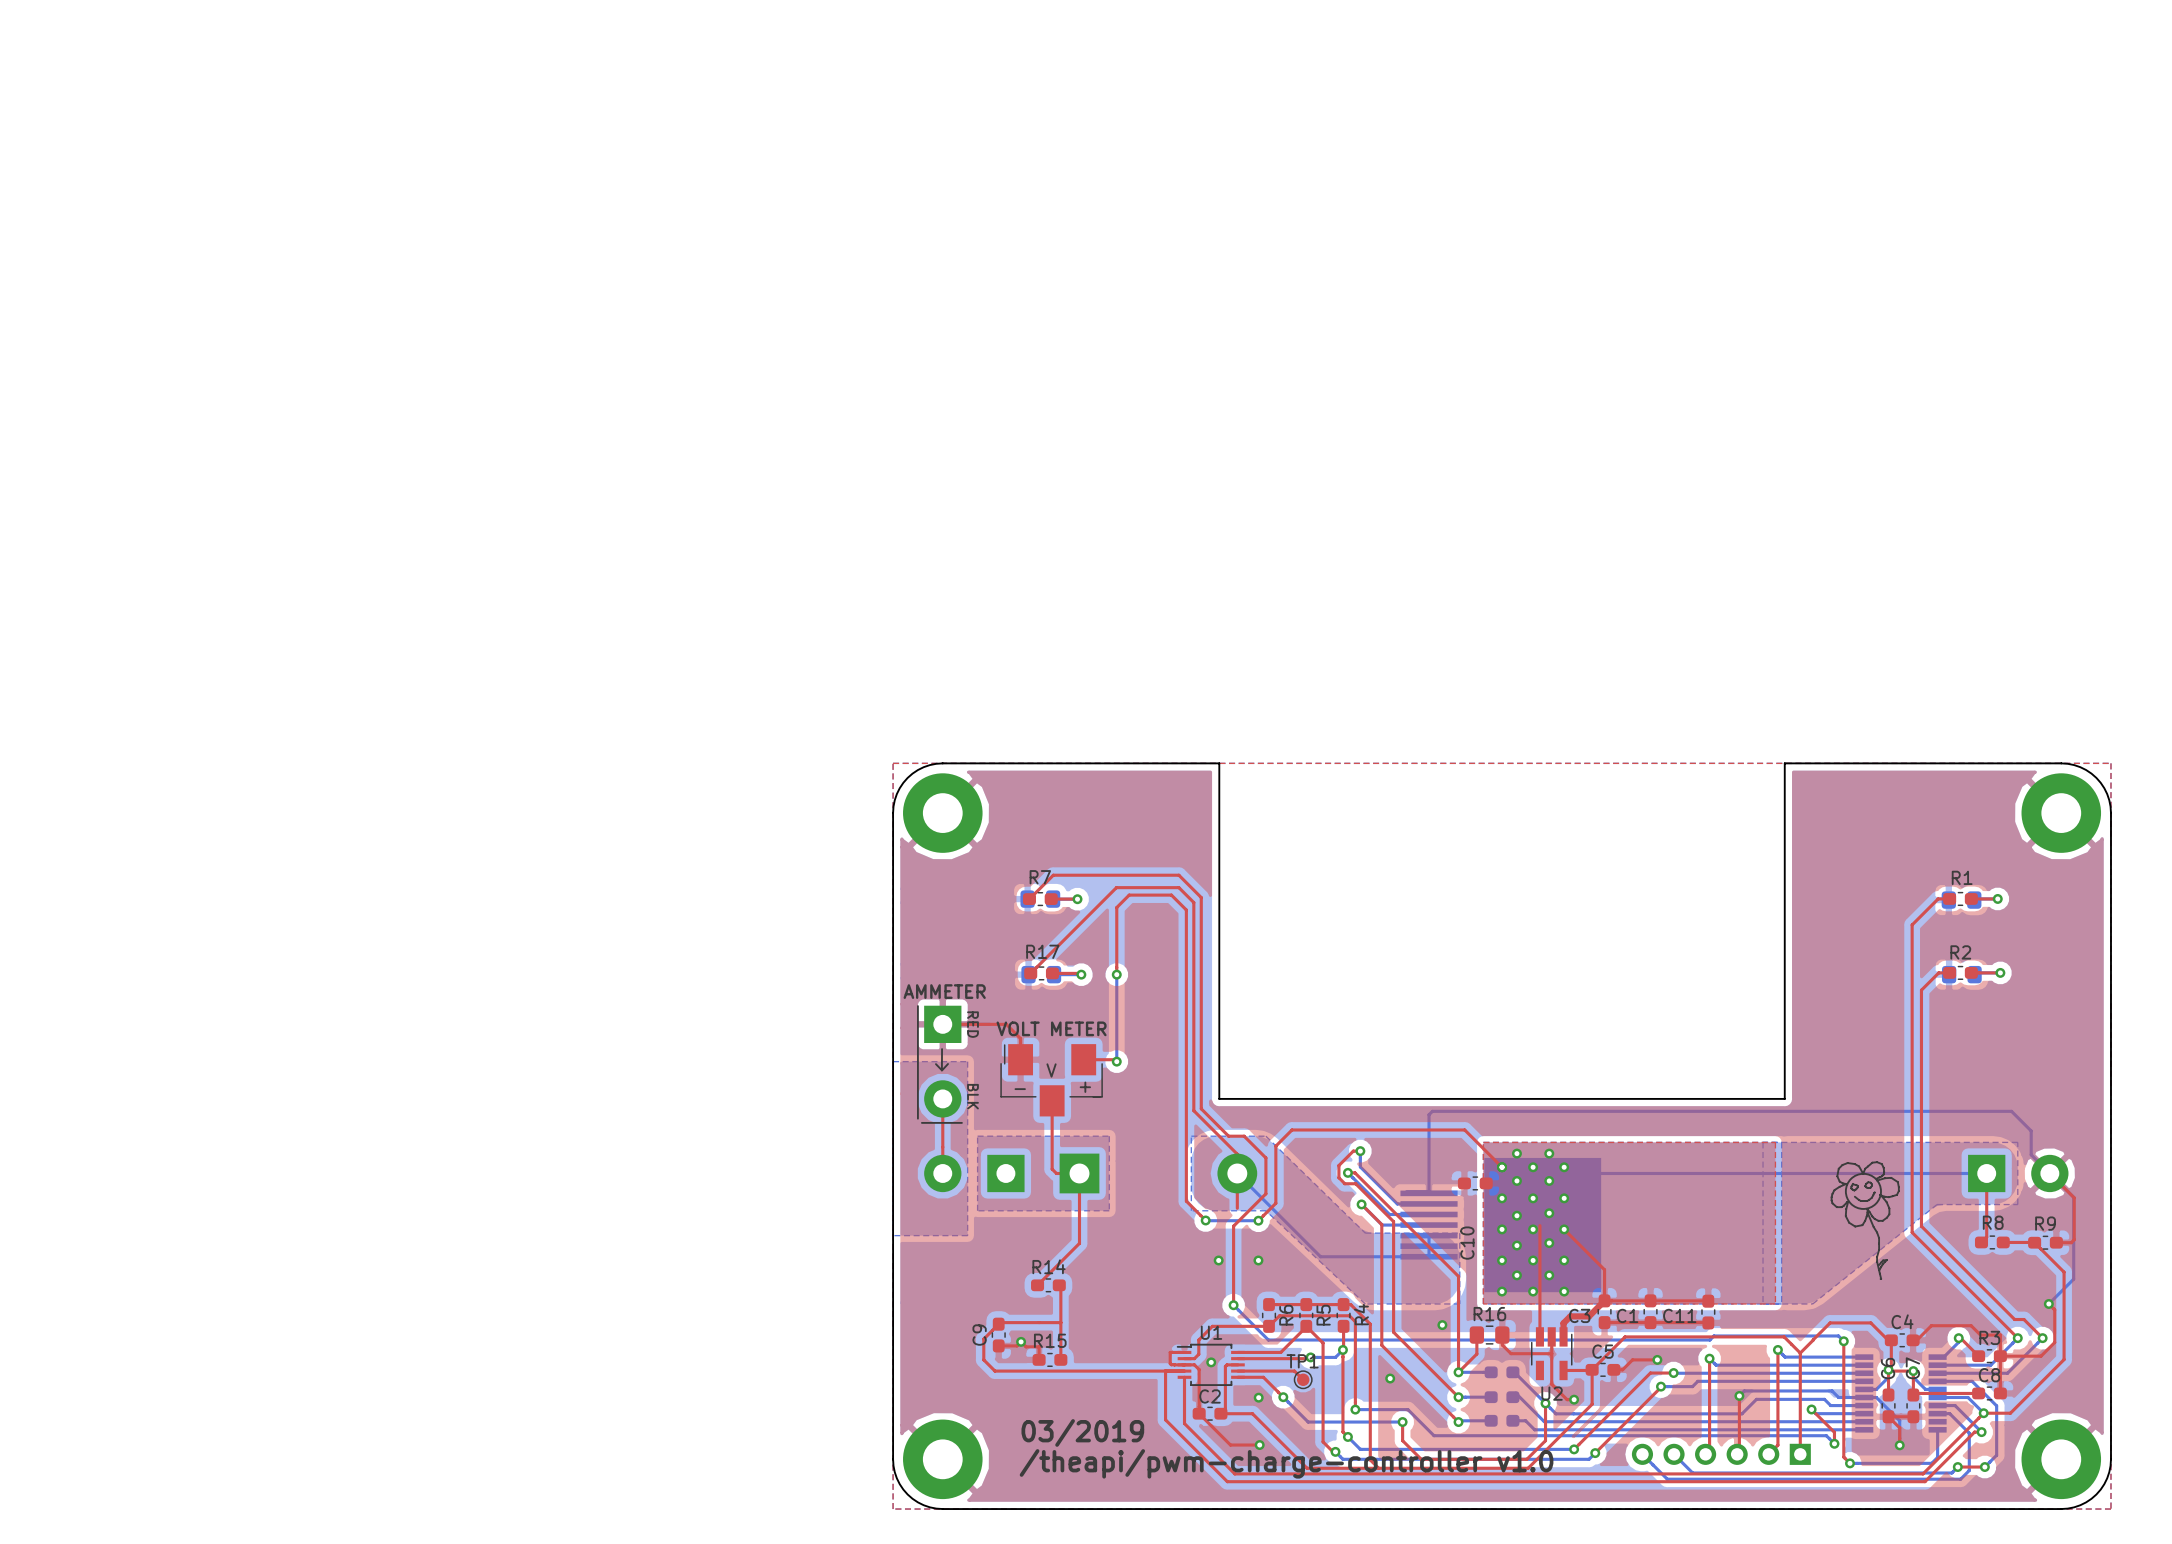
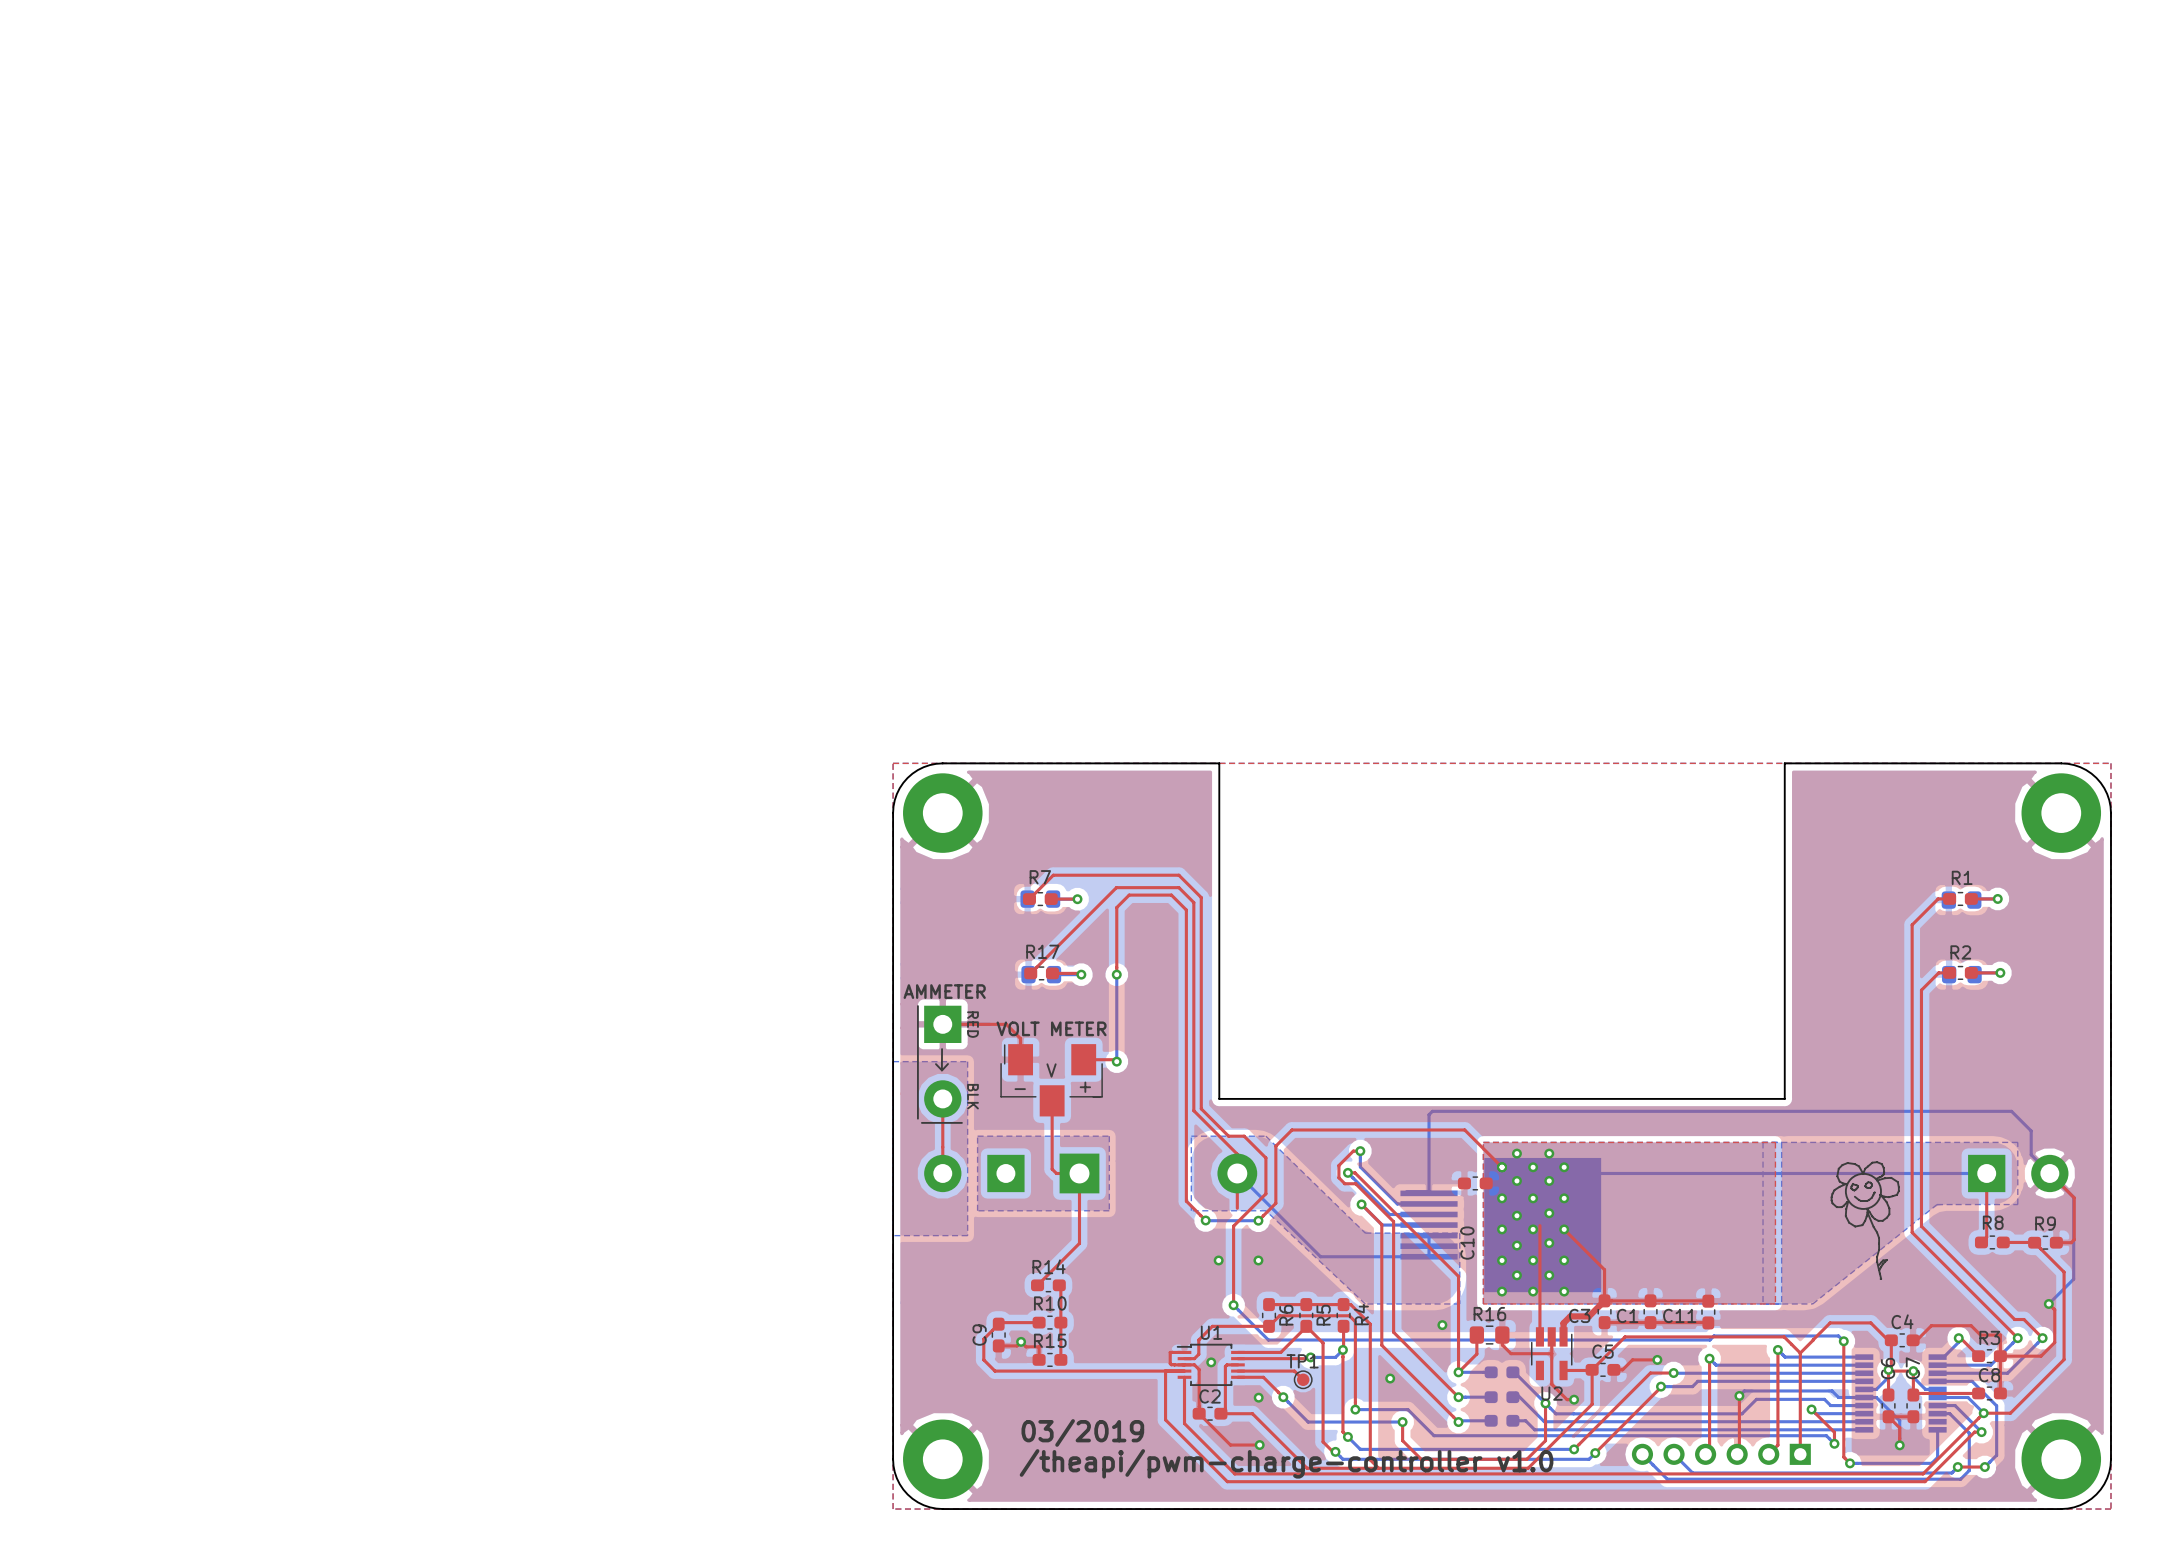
top track: (1039, 1322) (1060, 1322) -> none
R10: none -> (1049, 1322)

